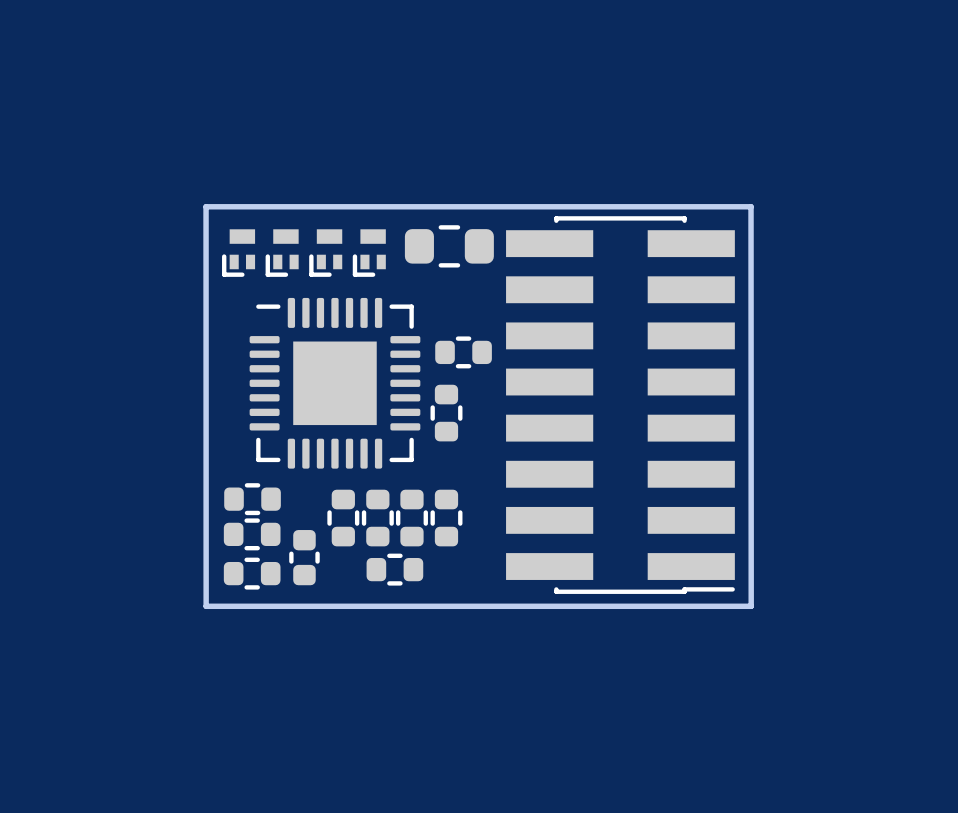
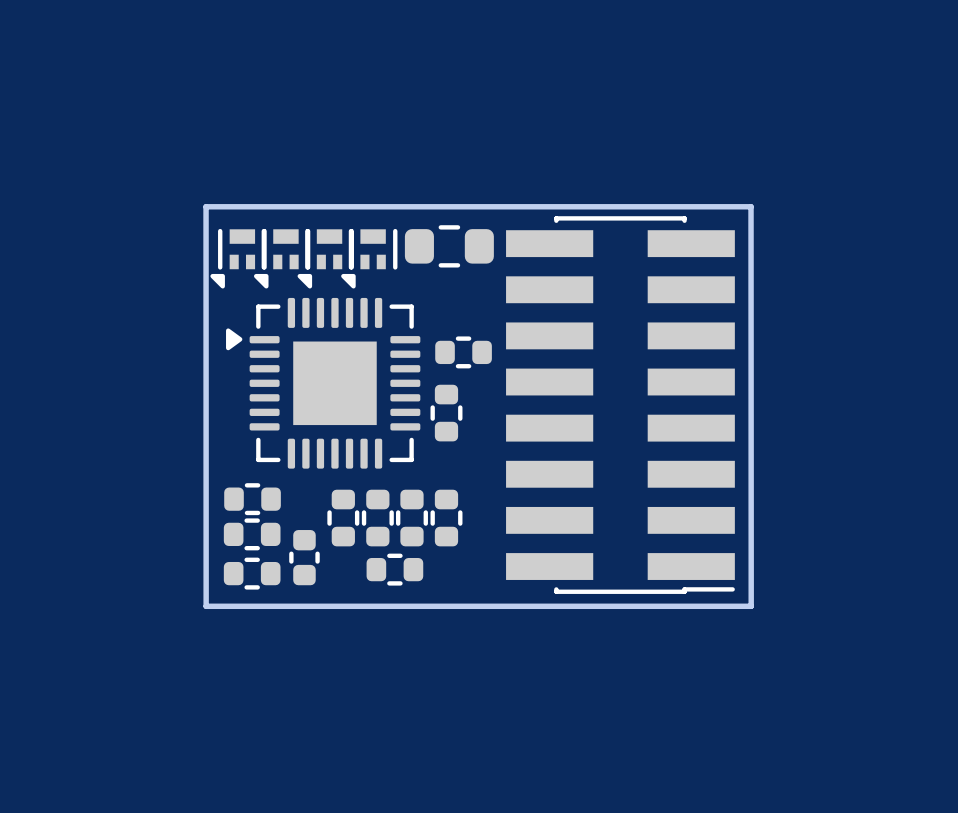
part footprint: [222, 229, 256, 277] -> [210, 228, 267, 289]
part footprint: [265, 229, 299, 277] -> [253, 228, 311, 289]
part footprint: [309, 229, 343, 277] -> [297, 228, 354, 289]
part footprint: [352, 229, 386, 277] -> [341, 228, 398, 289]
part footprint: [249, 297, 421, 469] -> [226, 297, 421, 469]

